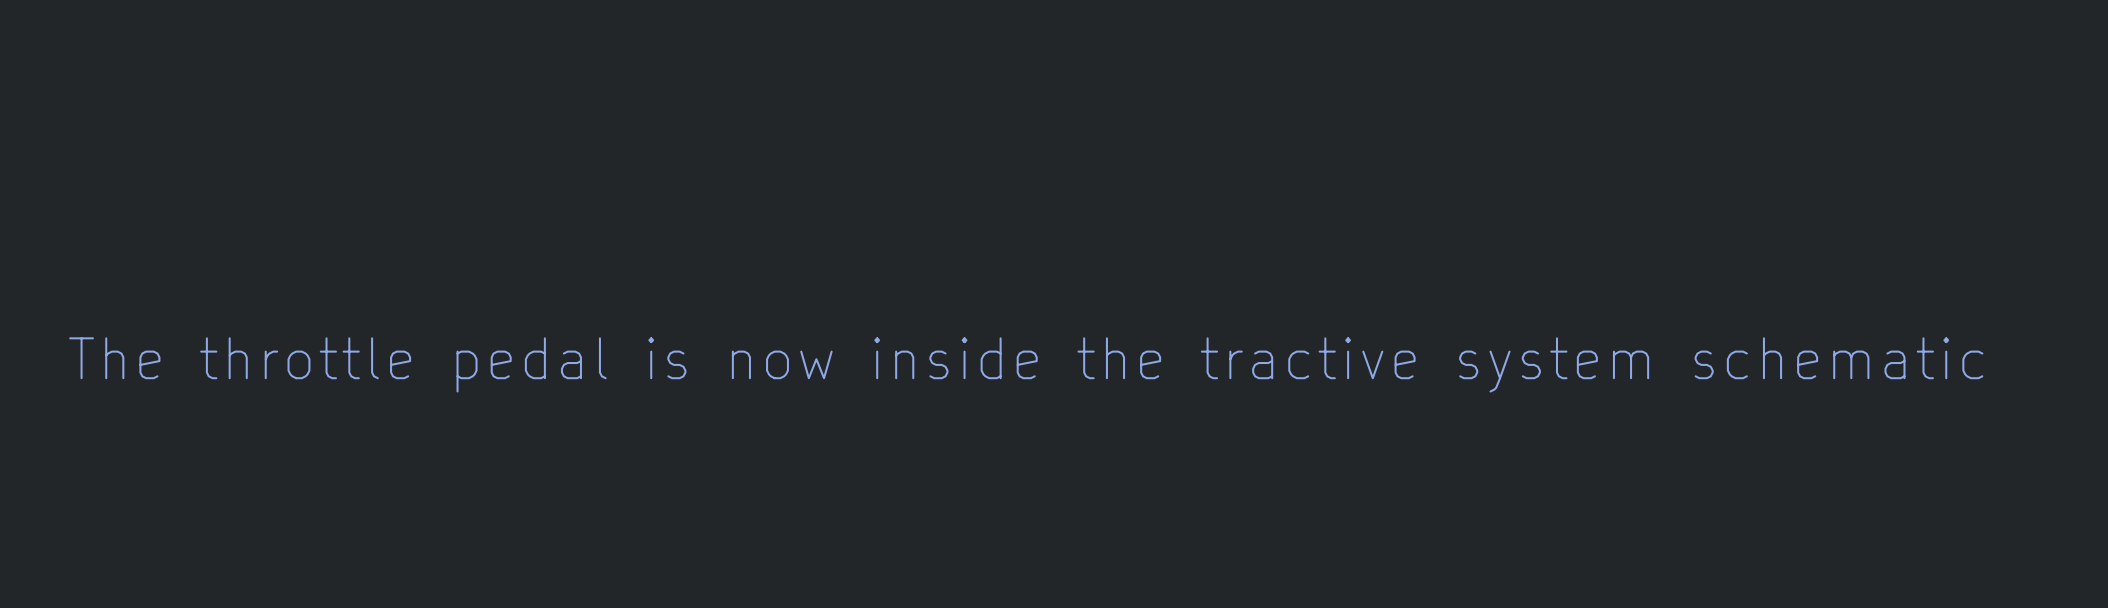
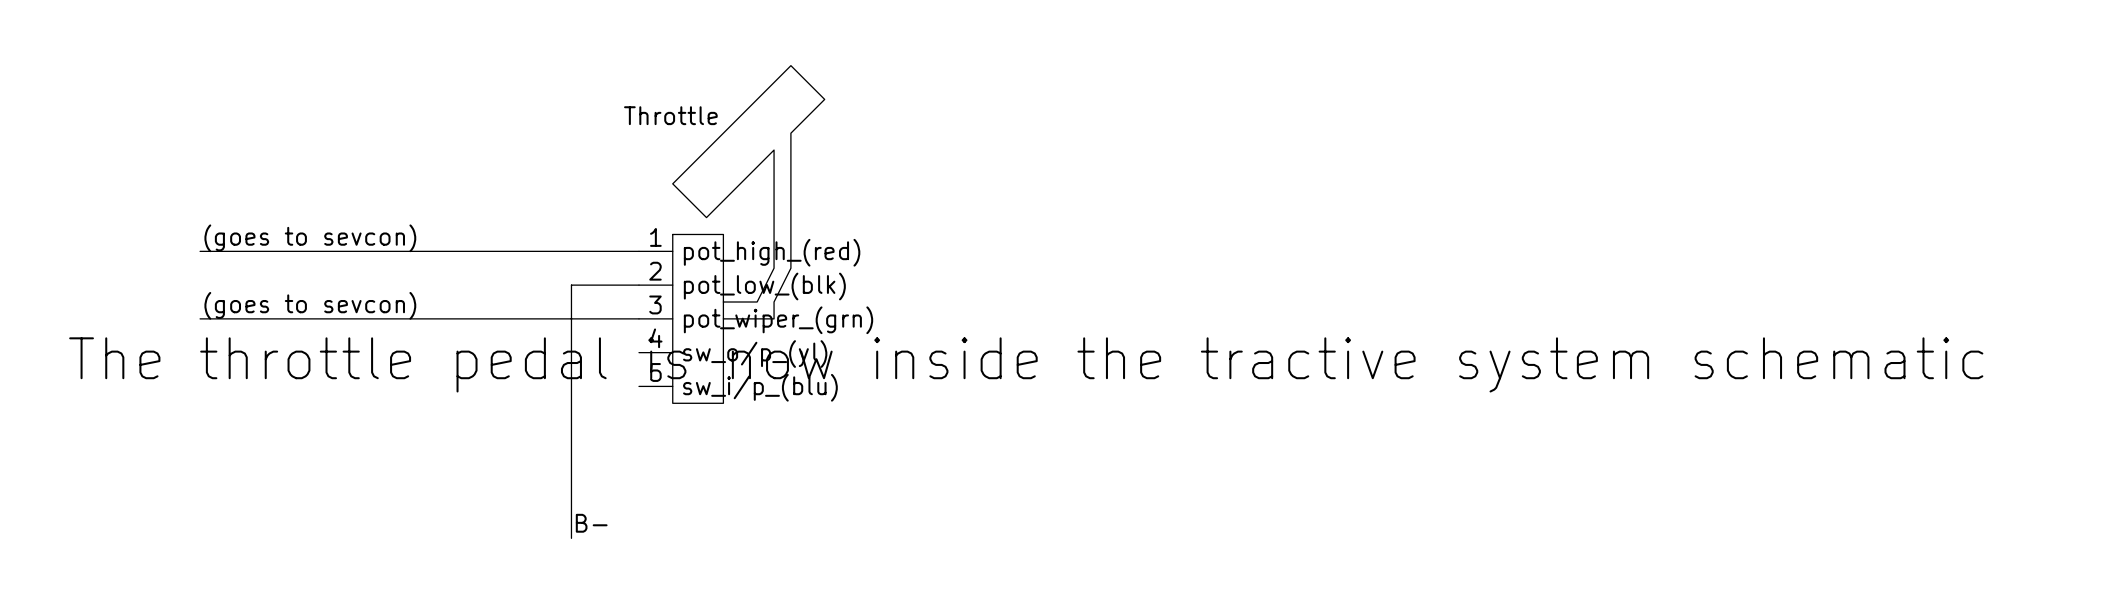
part: none -> Throttle (731, 234)
label: none -> (goes to sevcon) (310, 238)
wire: none -> (200, 251) (638, 251)
wire: none -> (638, 285) (571, 285) (571, 538)
label: none -> (goes to sevcon) (310, 305)
wire: none -> (200, 318) (638, 318)
label: none -> B- (591, 523)

